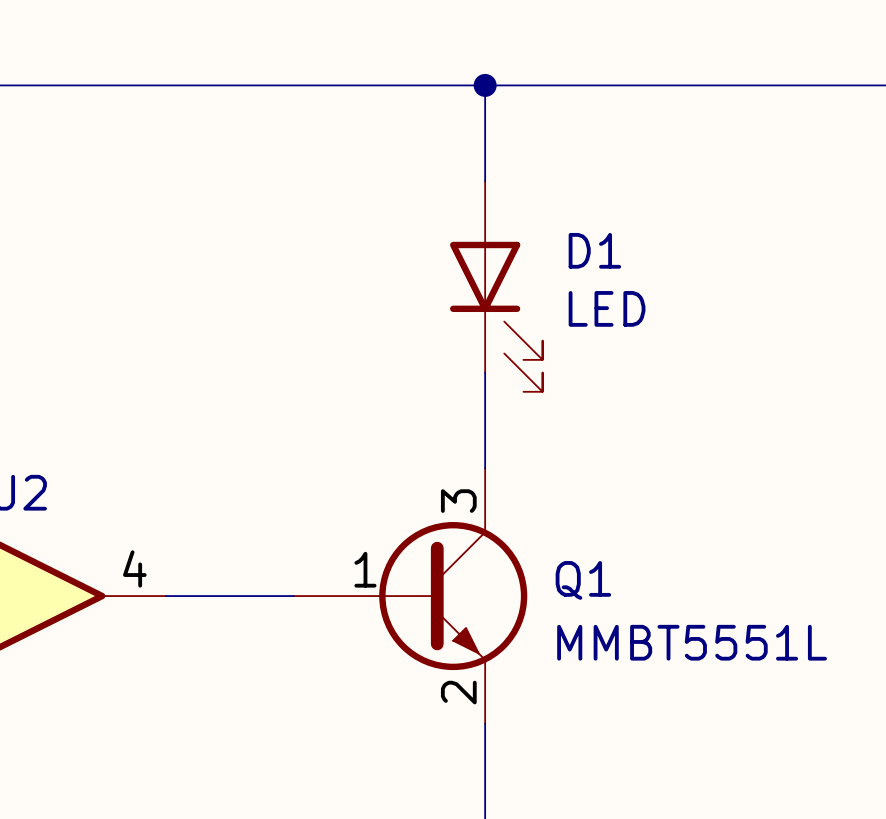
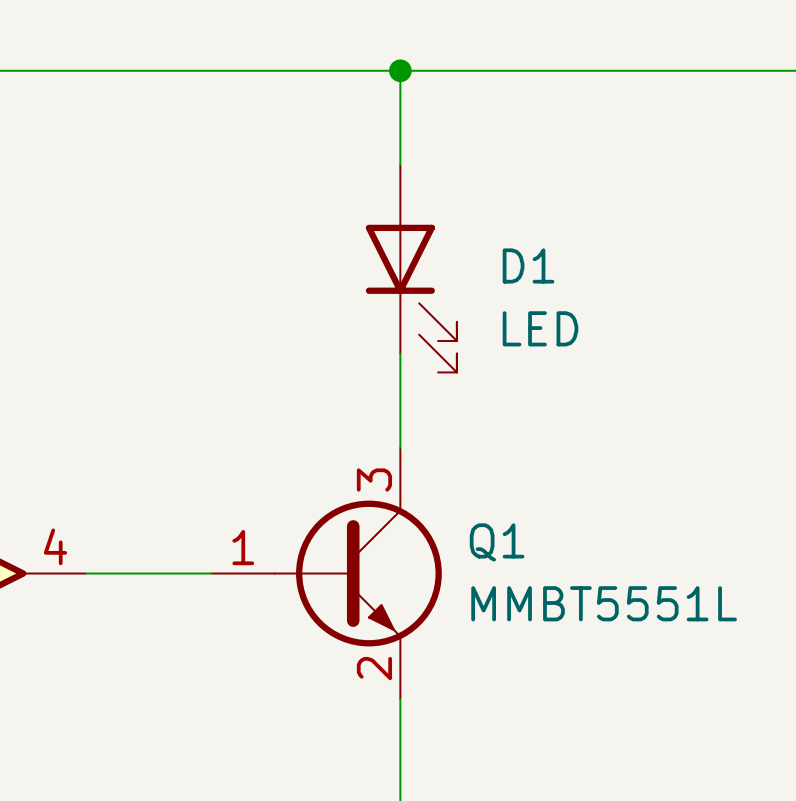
D1 name position: D1 (594, 250) -> D1 (528, 265)
D1 value position: LED (607, 308) -> LED (540, 328)
Q1 symbol: [293, 468, 528, 724] -> [211, 447, 442, 700]

